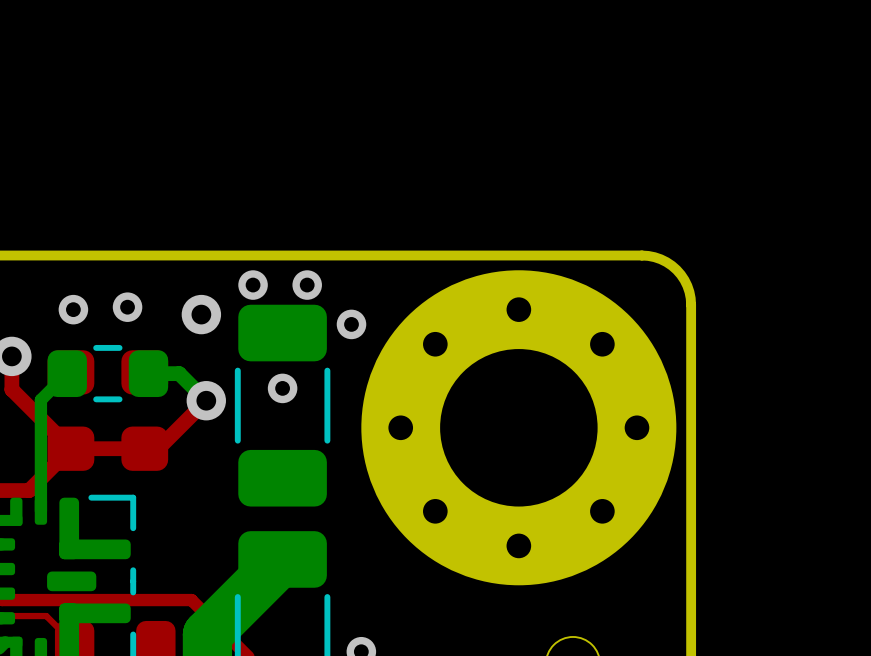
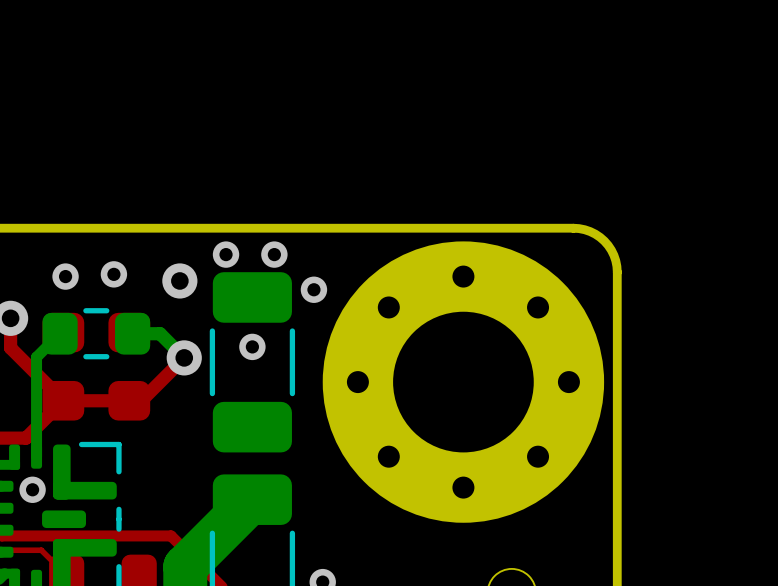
via: none -> (32, 489)

